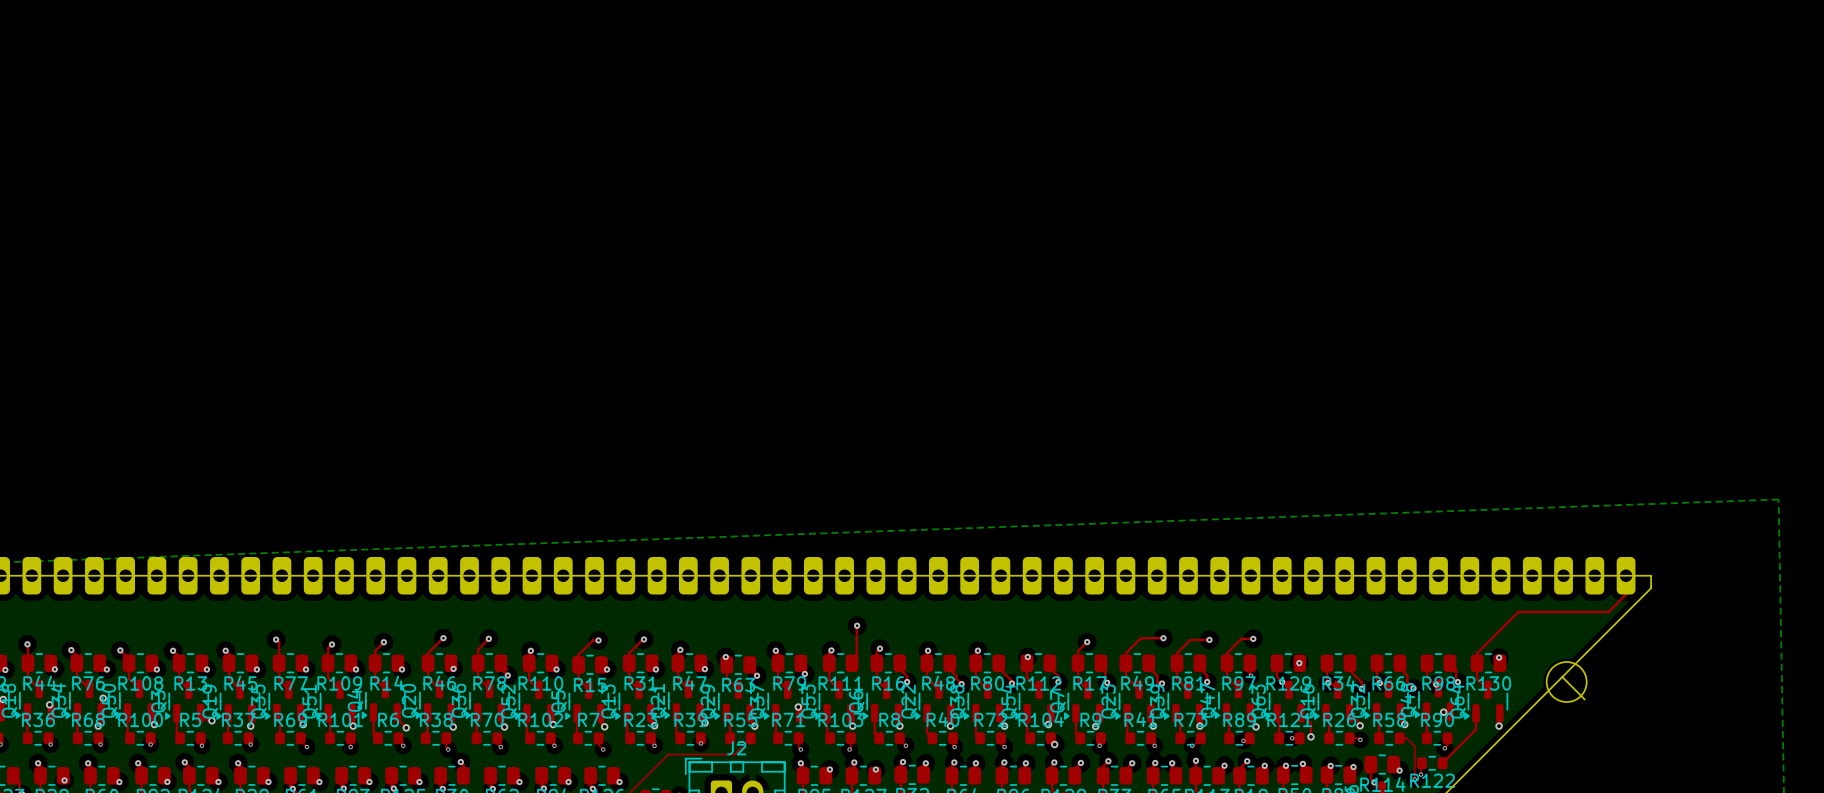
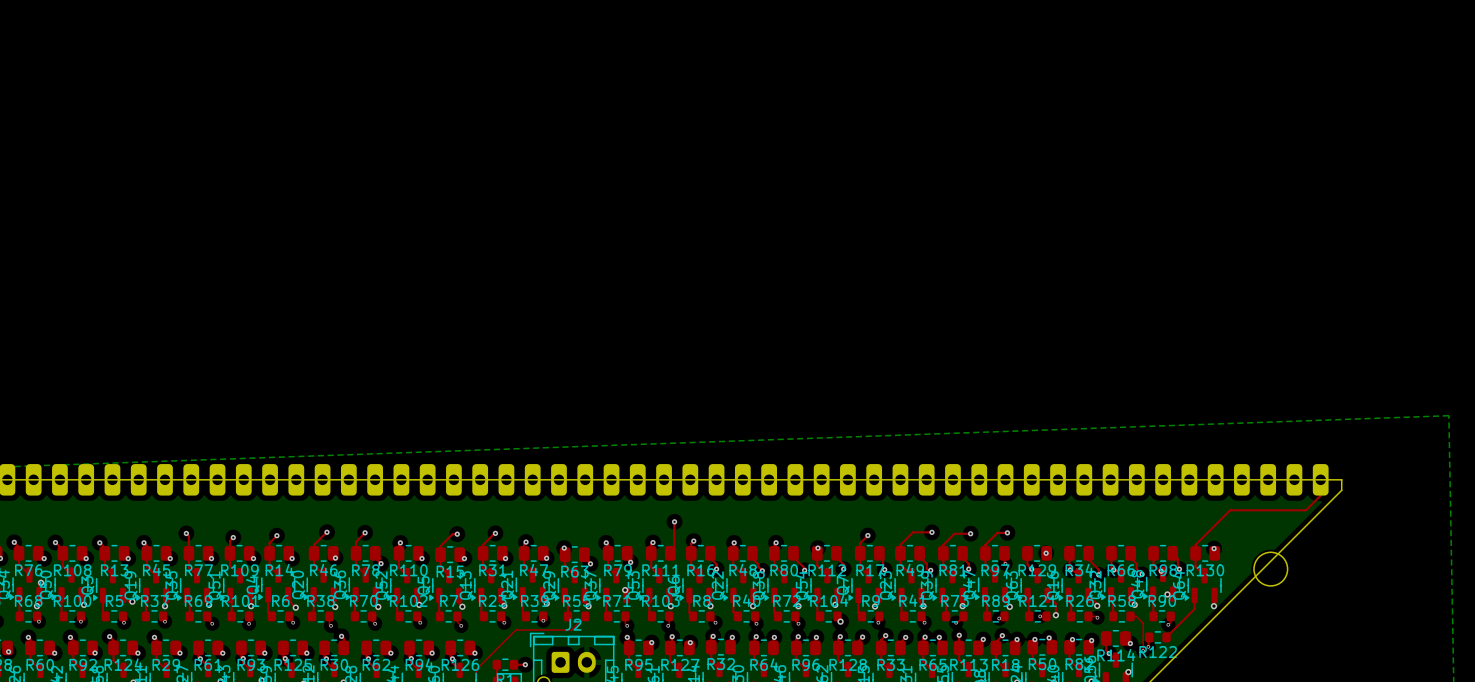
board edge: (1562, 677) (1584, 699) -> none

